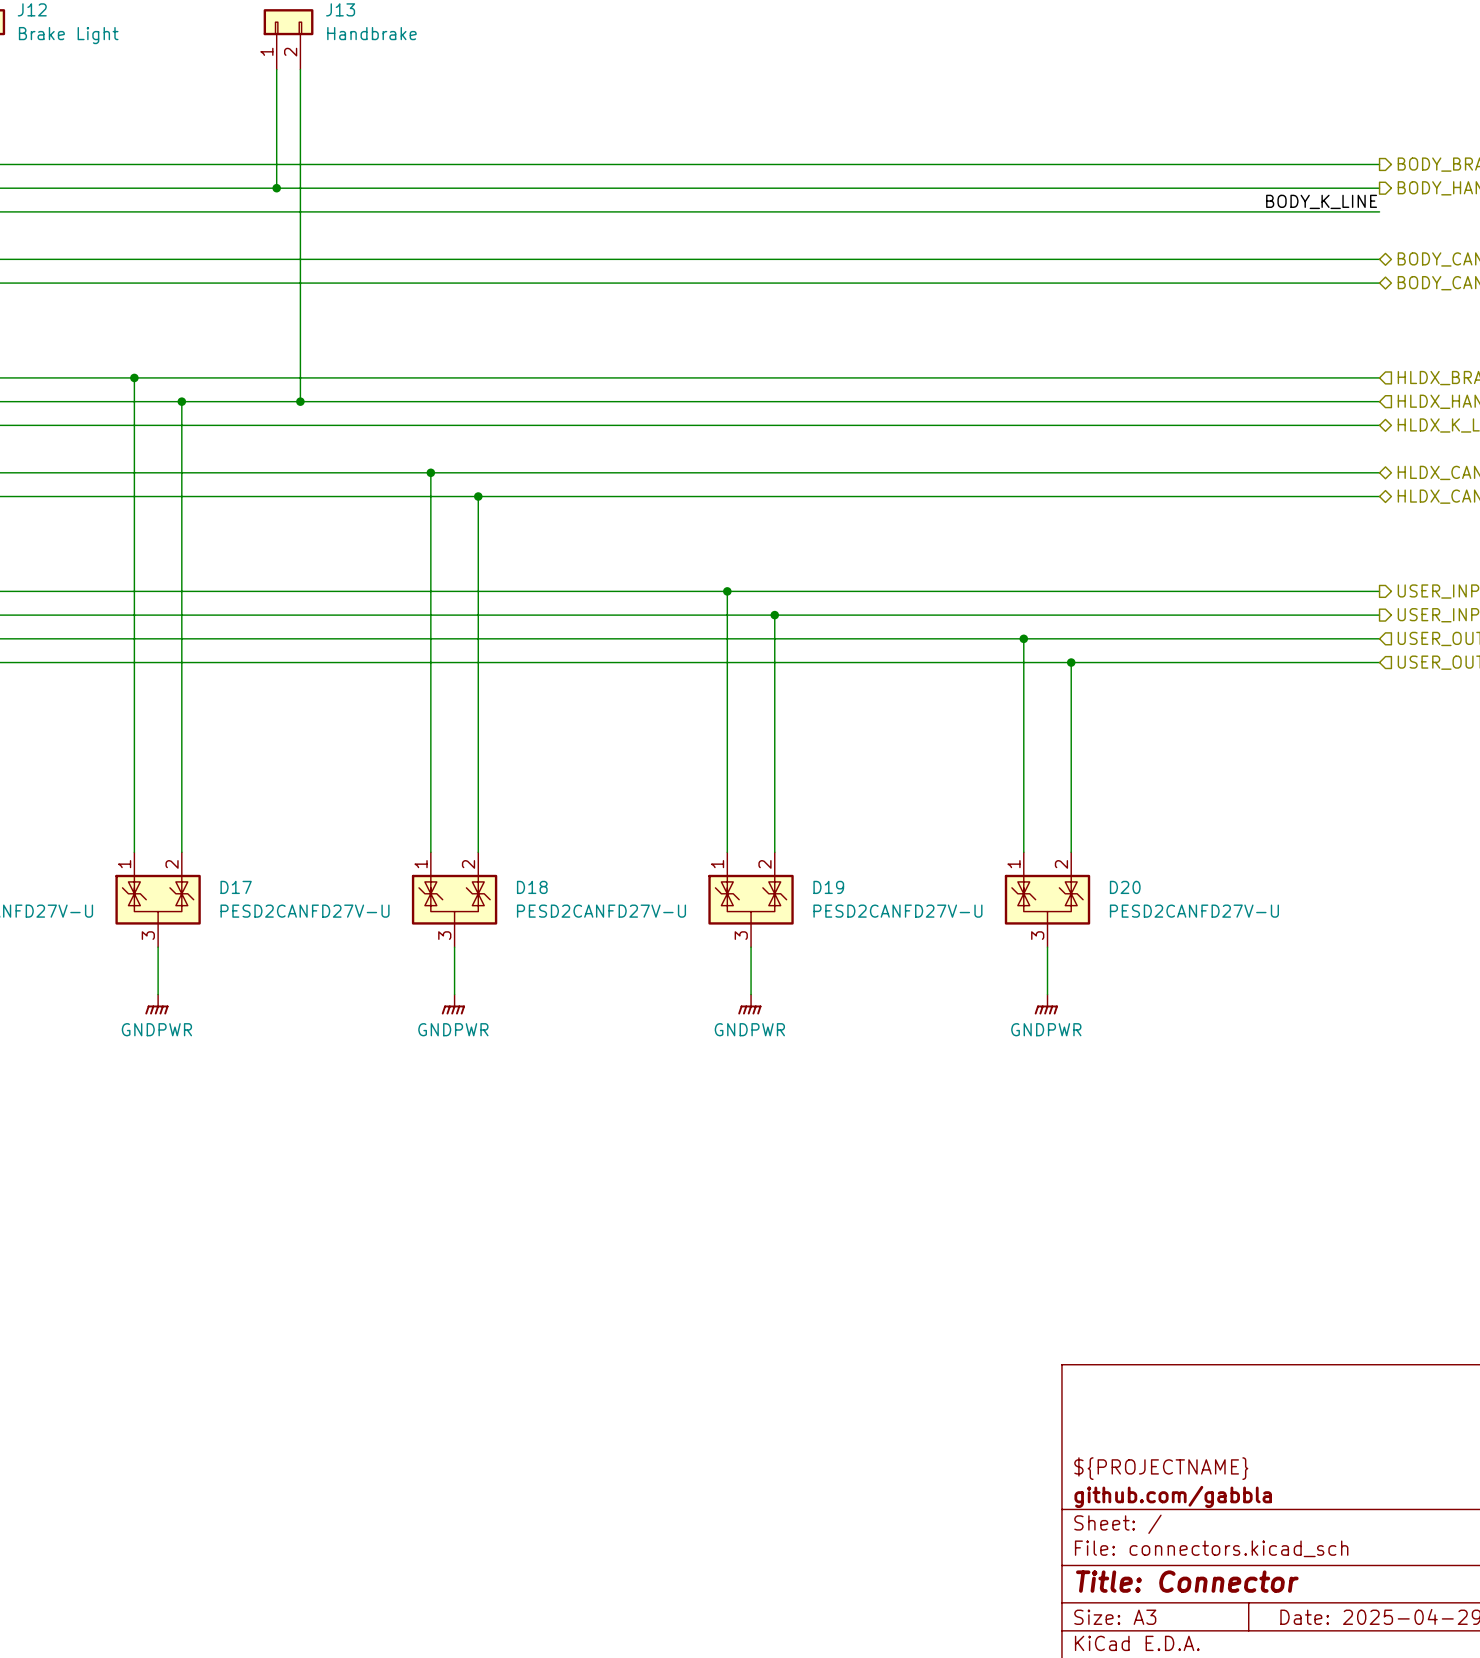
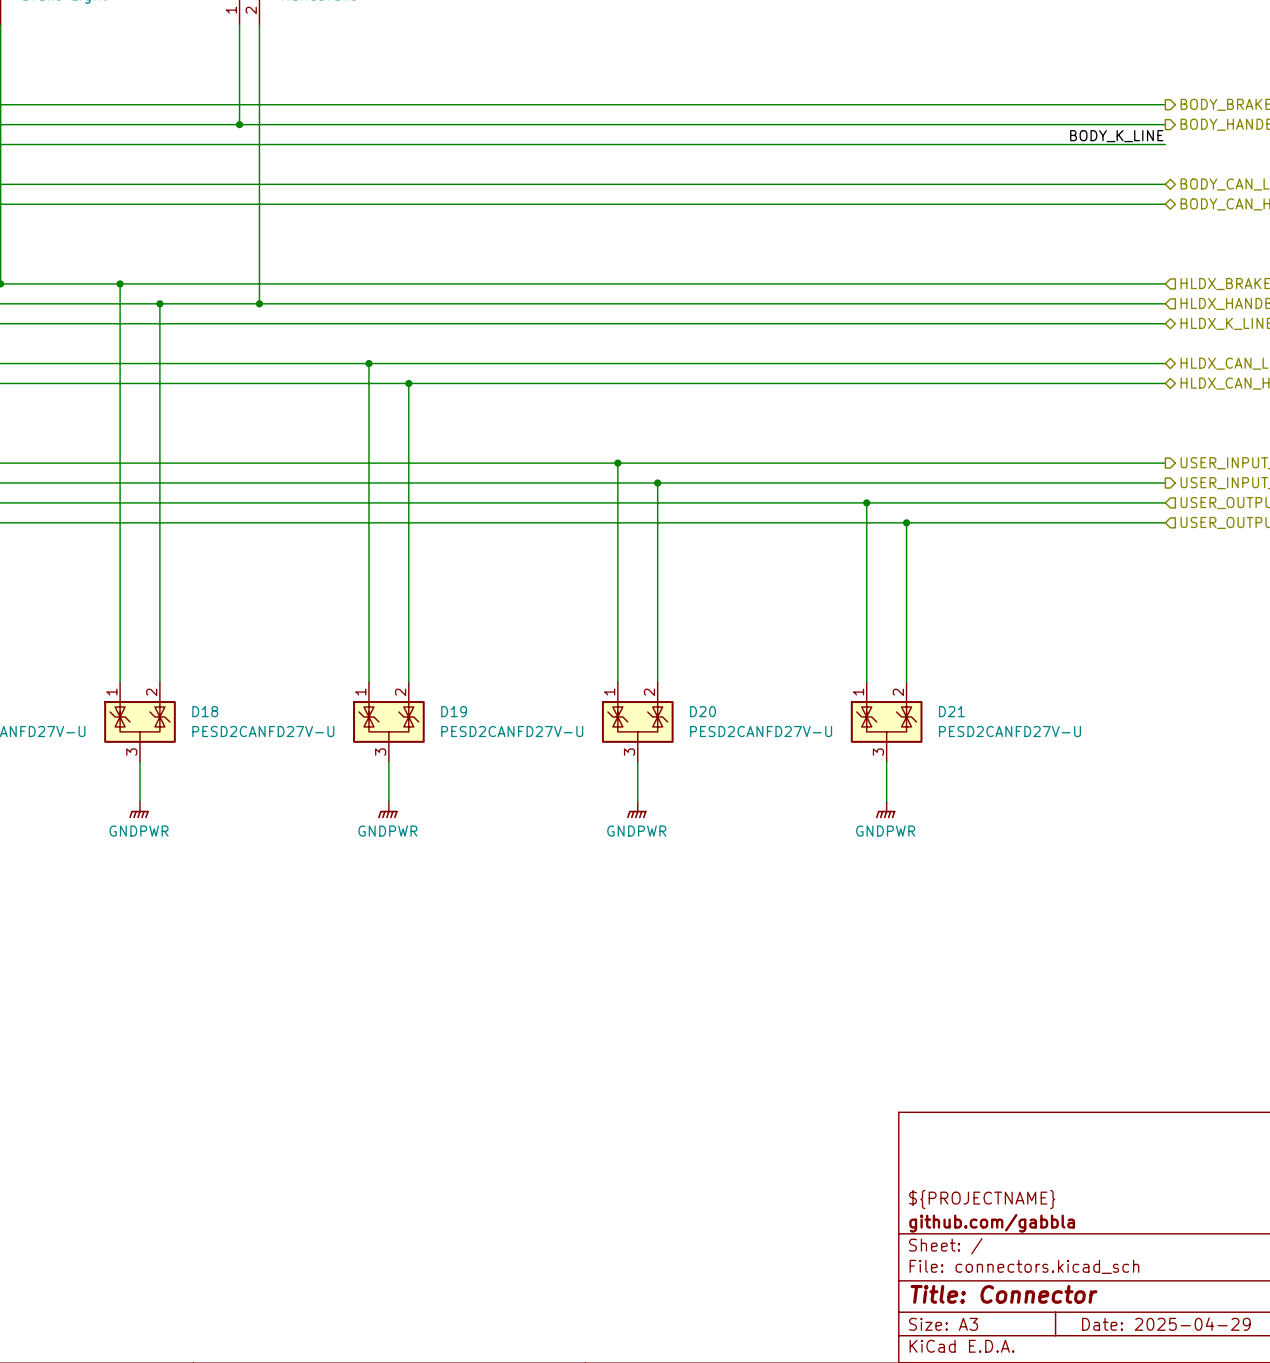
D17 name: D17 (236, 887) -> D18 (205, 711)
D18 name: D18 (532, 887) -> D19 (454, 711)
D19 name: D19 (828, 887) -> D20 (703, 711)
D20 name: D20 (1125, 887) -> D21 (951, 711)

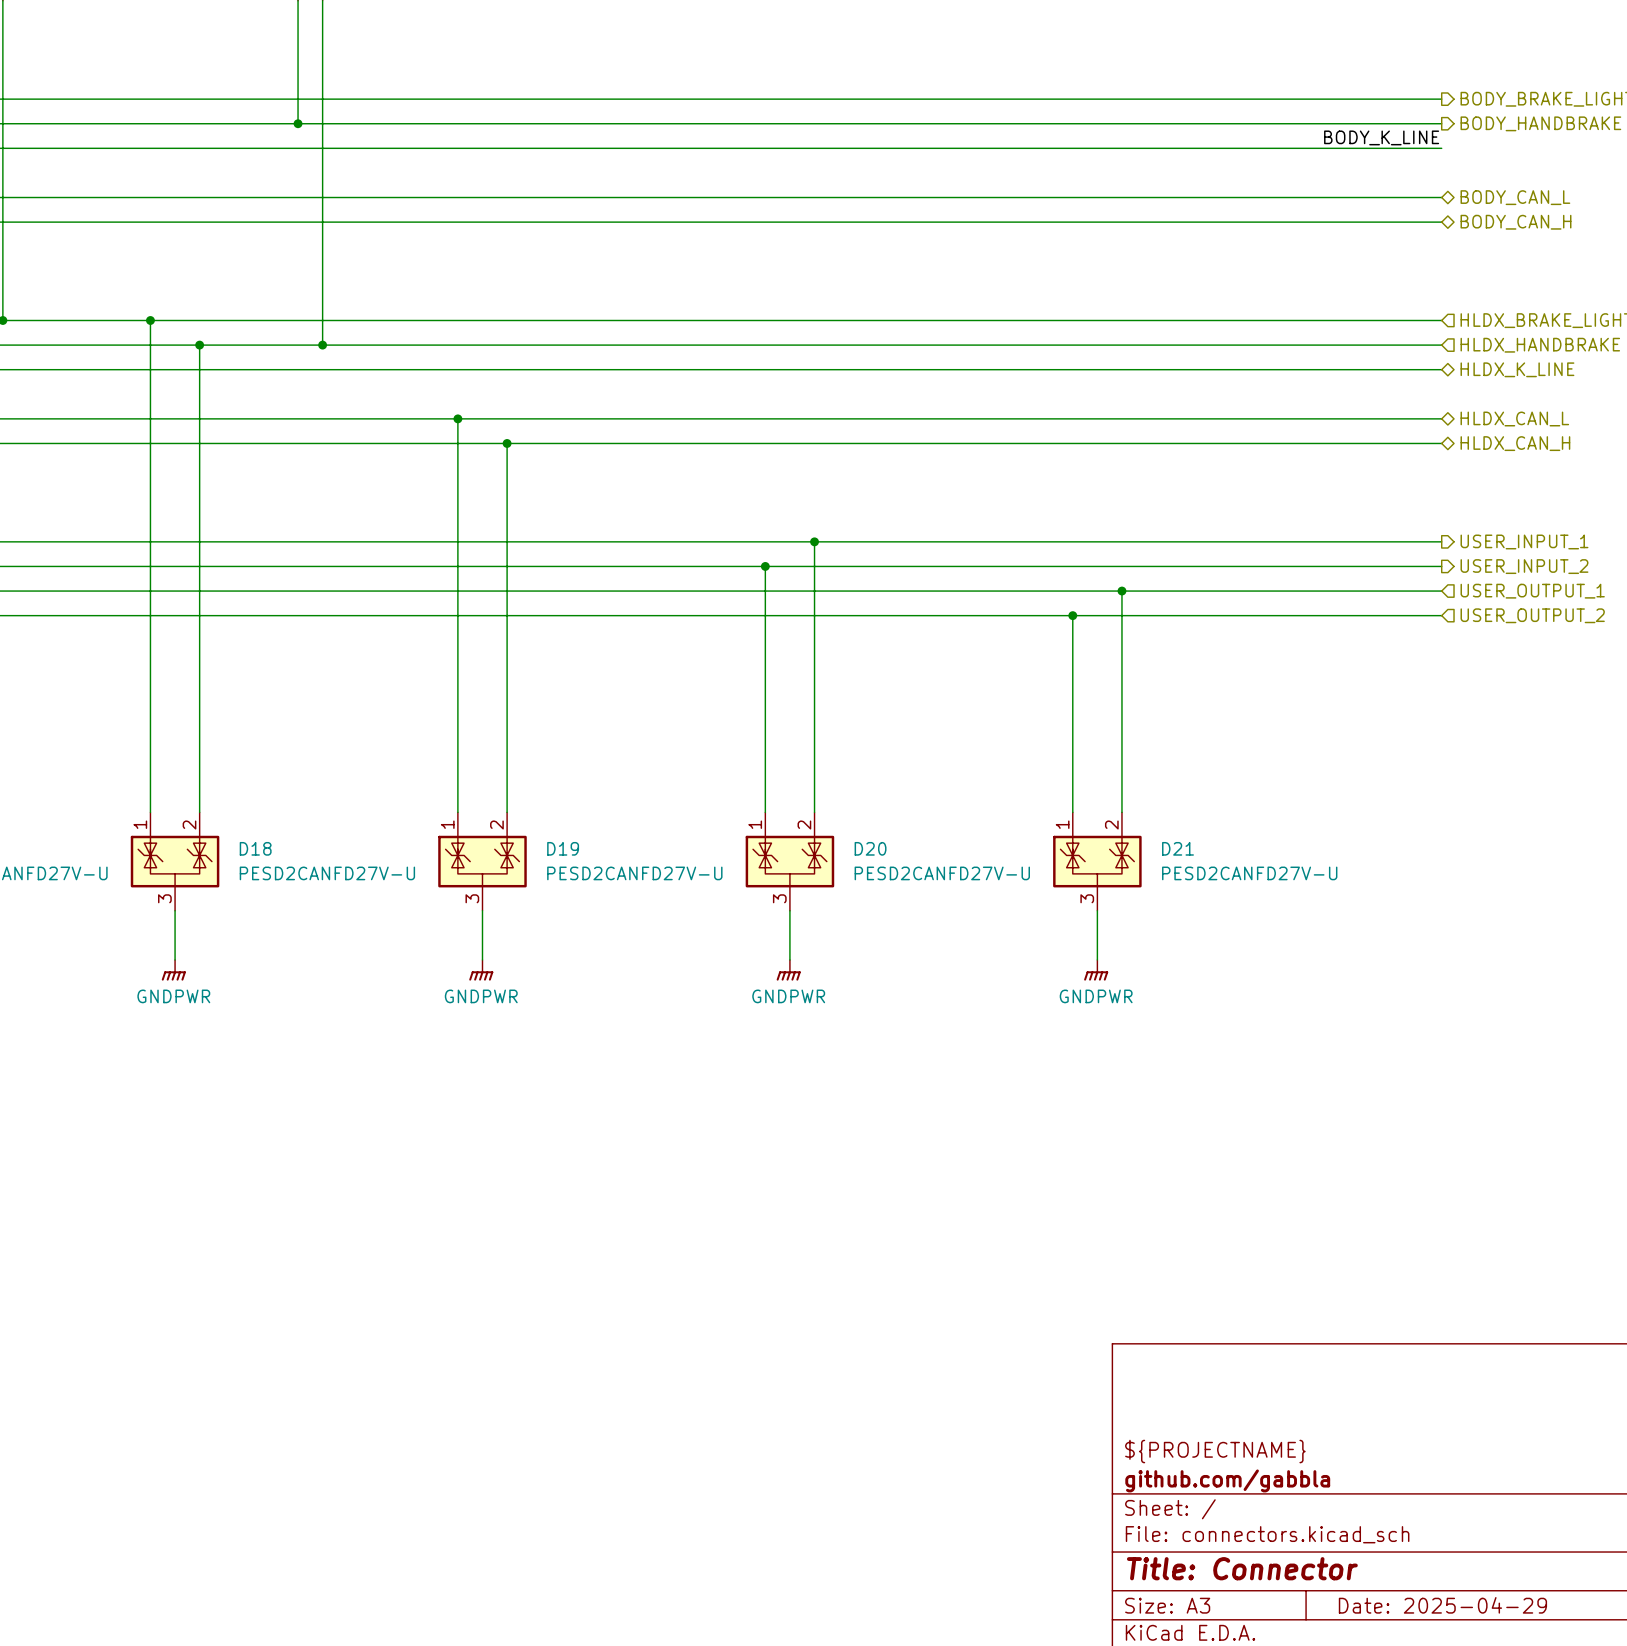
wire: (617, 463) (617, 483) -> (814, 541) (814, 566)
junction: (617, 463) -> none
junction: none -> (814, 541)
junction: none -> (765, 566)
junction: (657, 483) -> none
wire: (866, 502) (866, 522) -> (1121, 591) (1121, 615)
junction: (866, 502) -> none
junction: none -> (1121, 591)
junction: none -> (1072, 615)
junction: (906, 522) -> none

